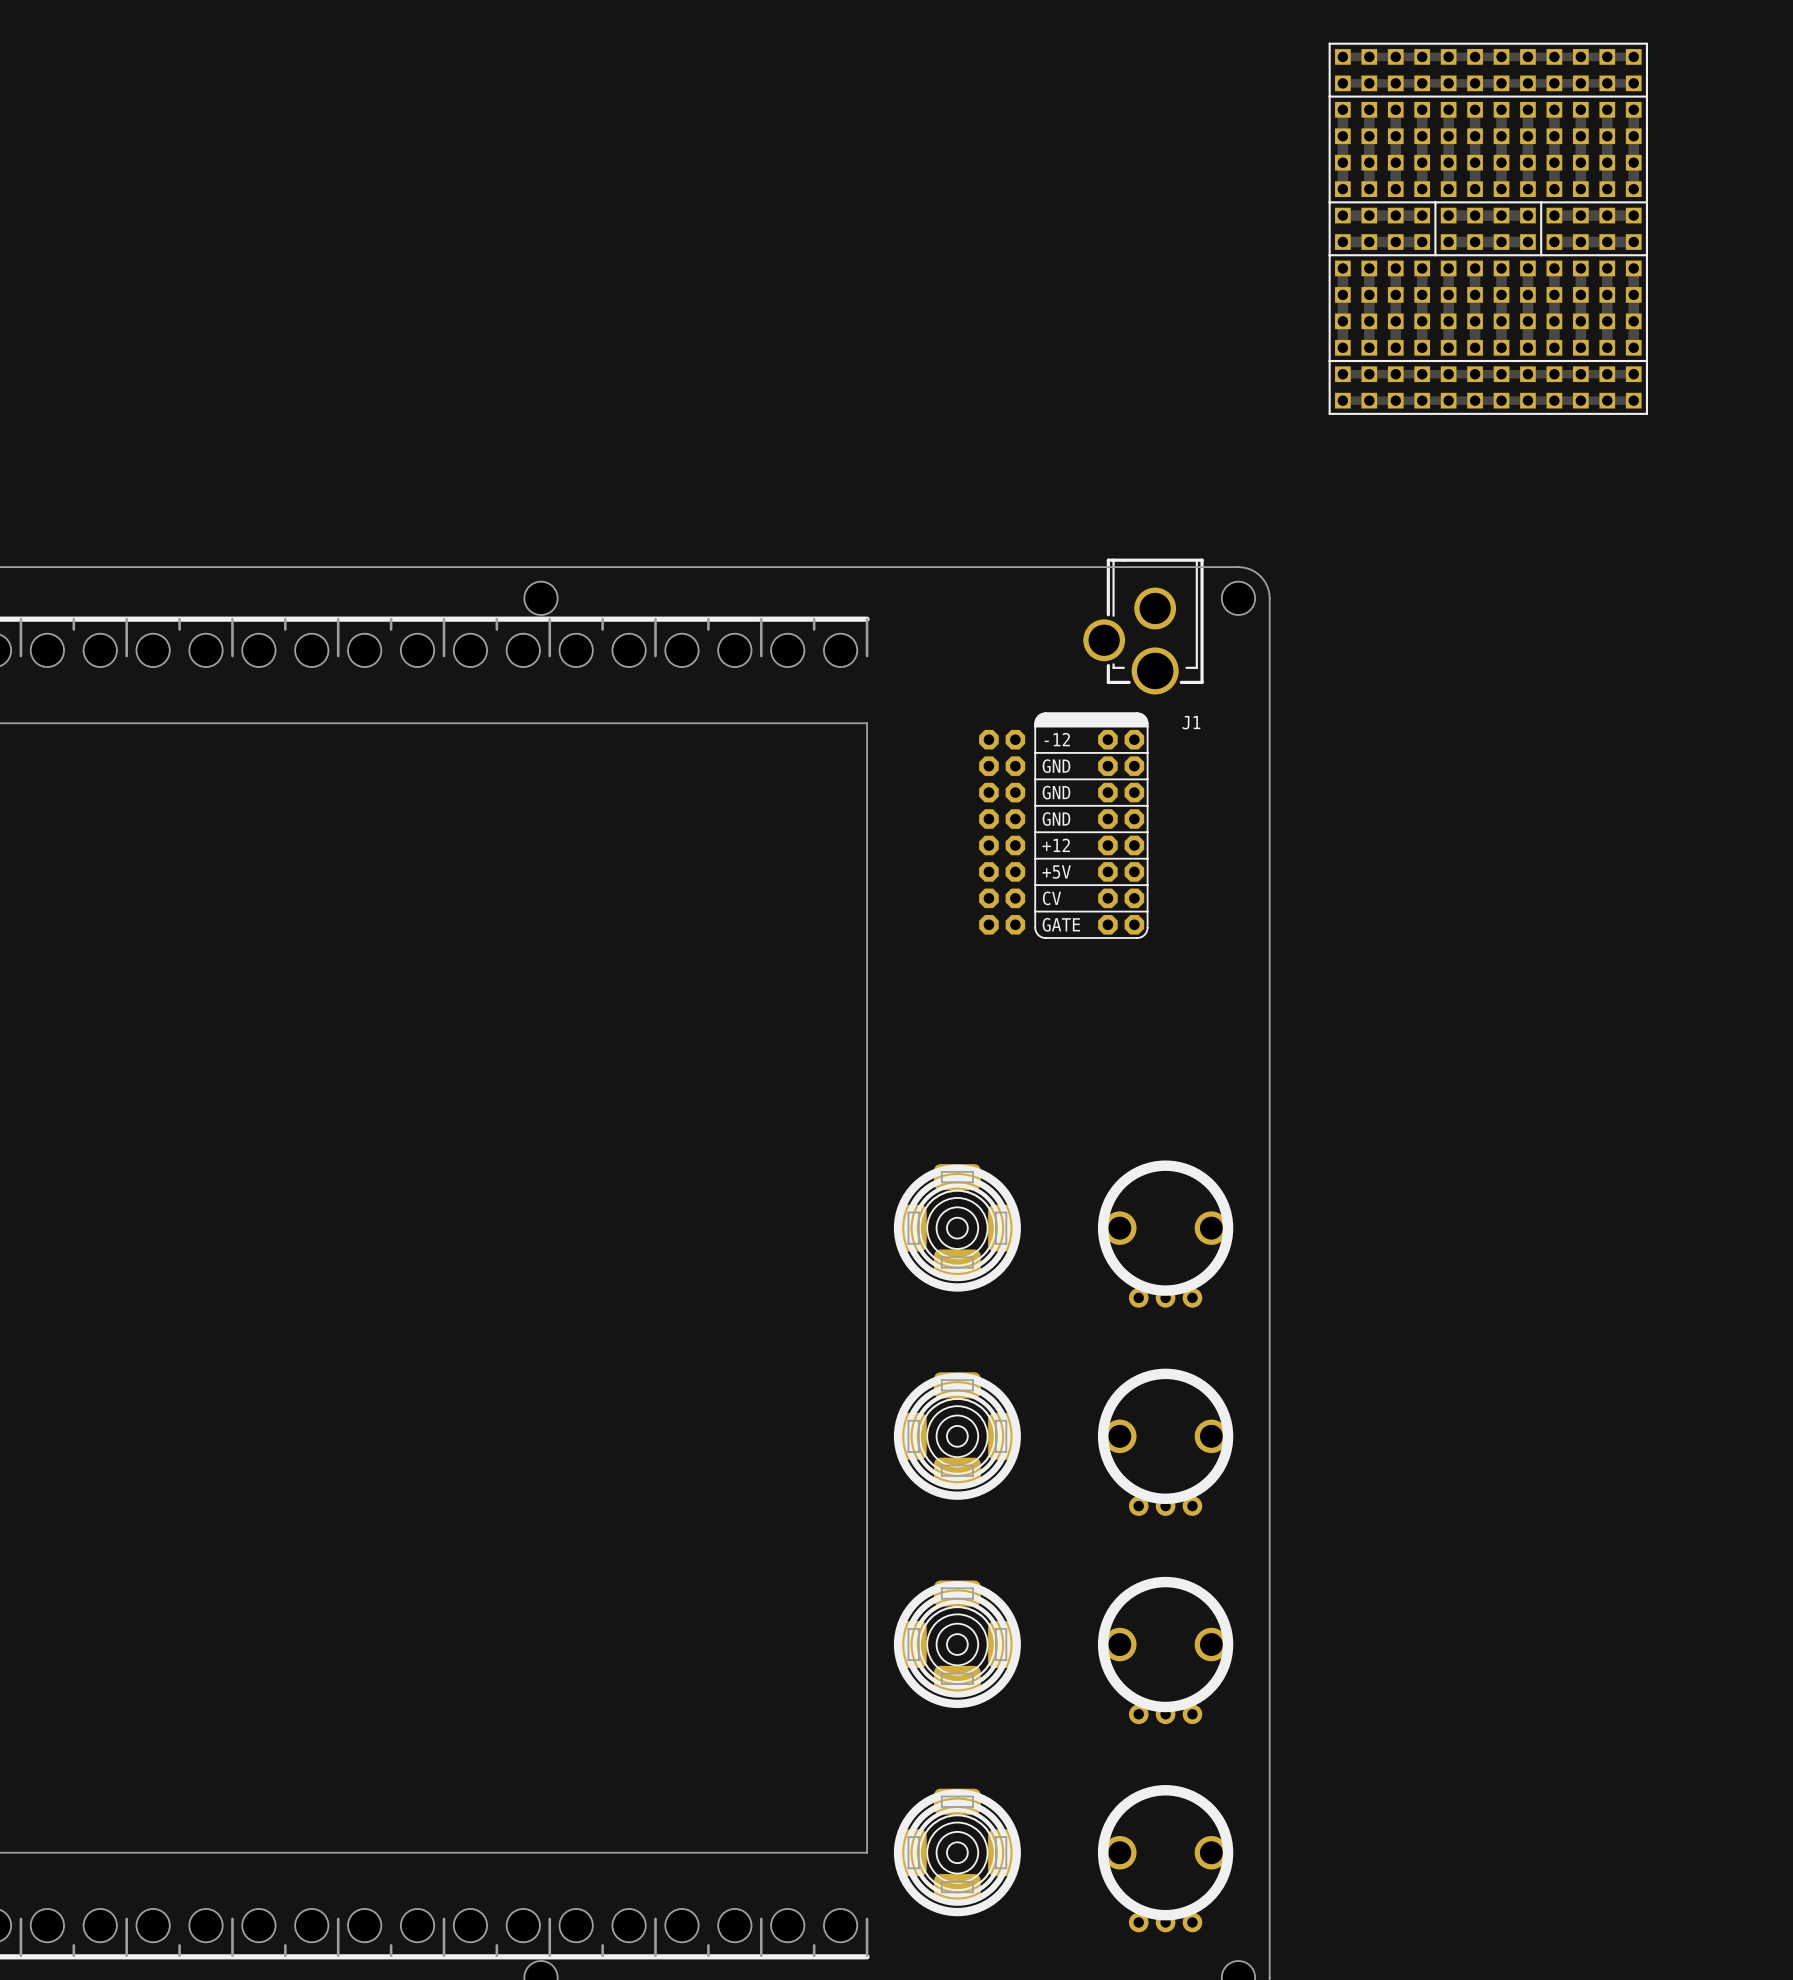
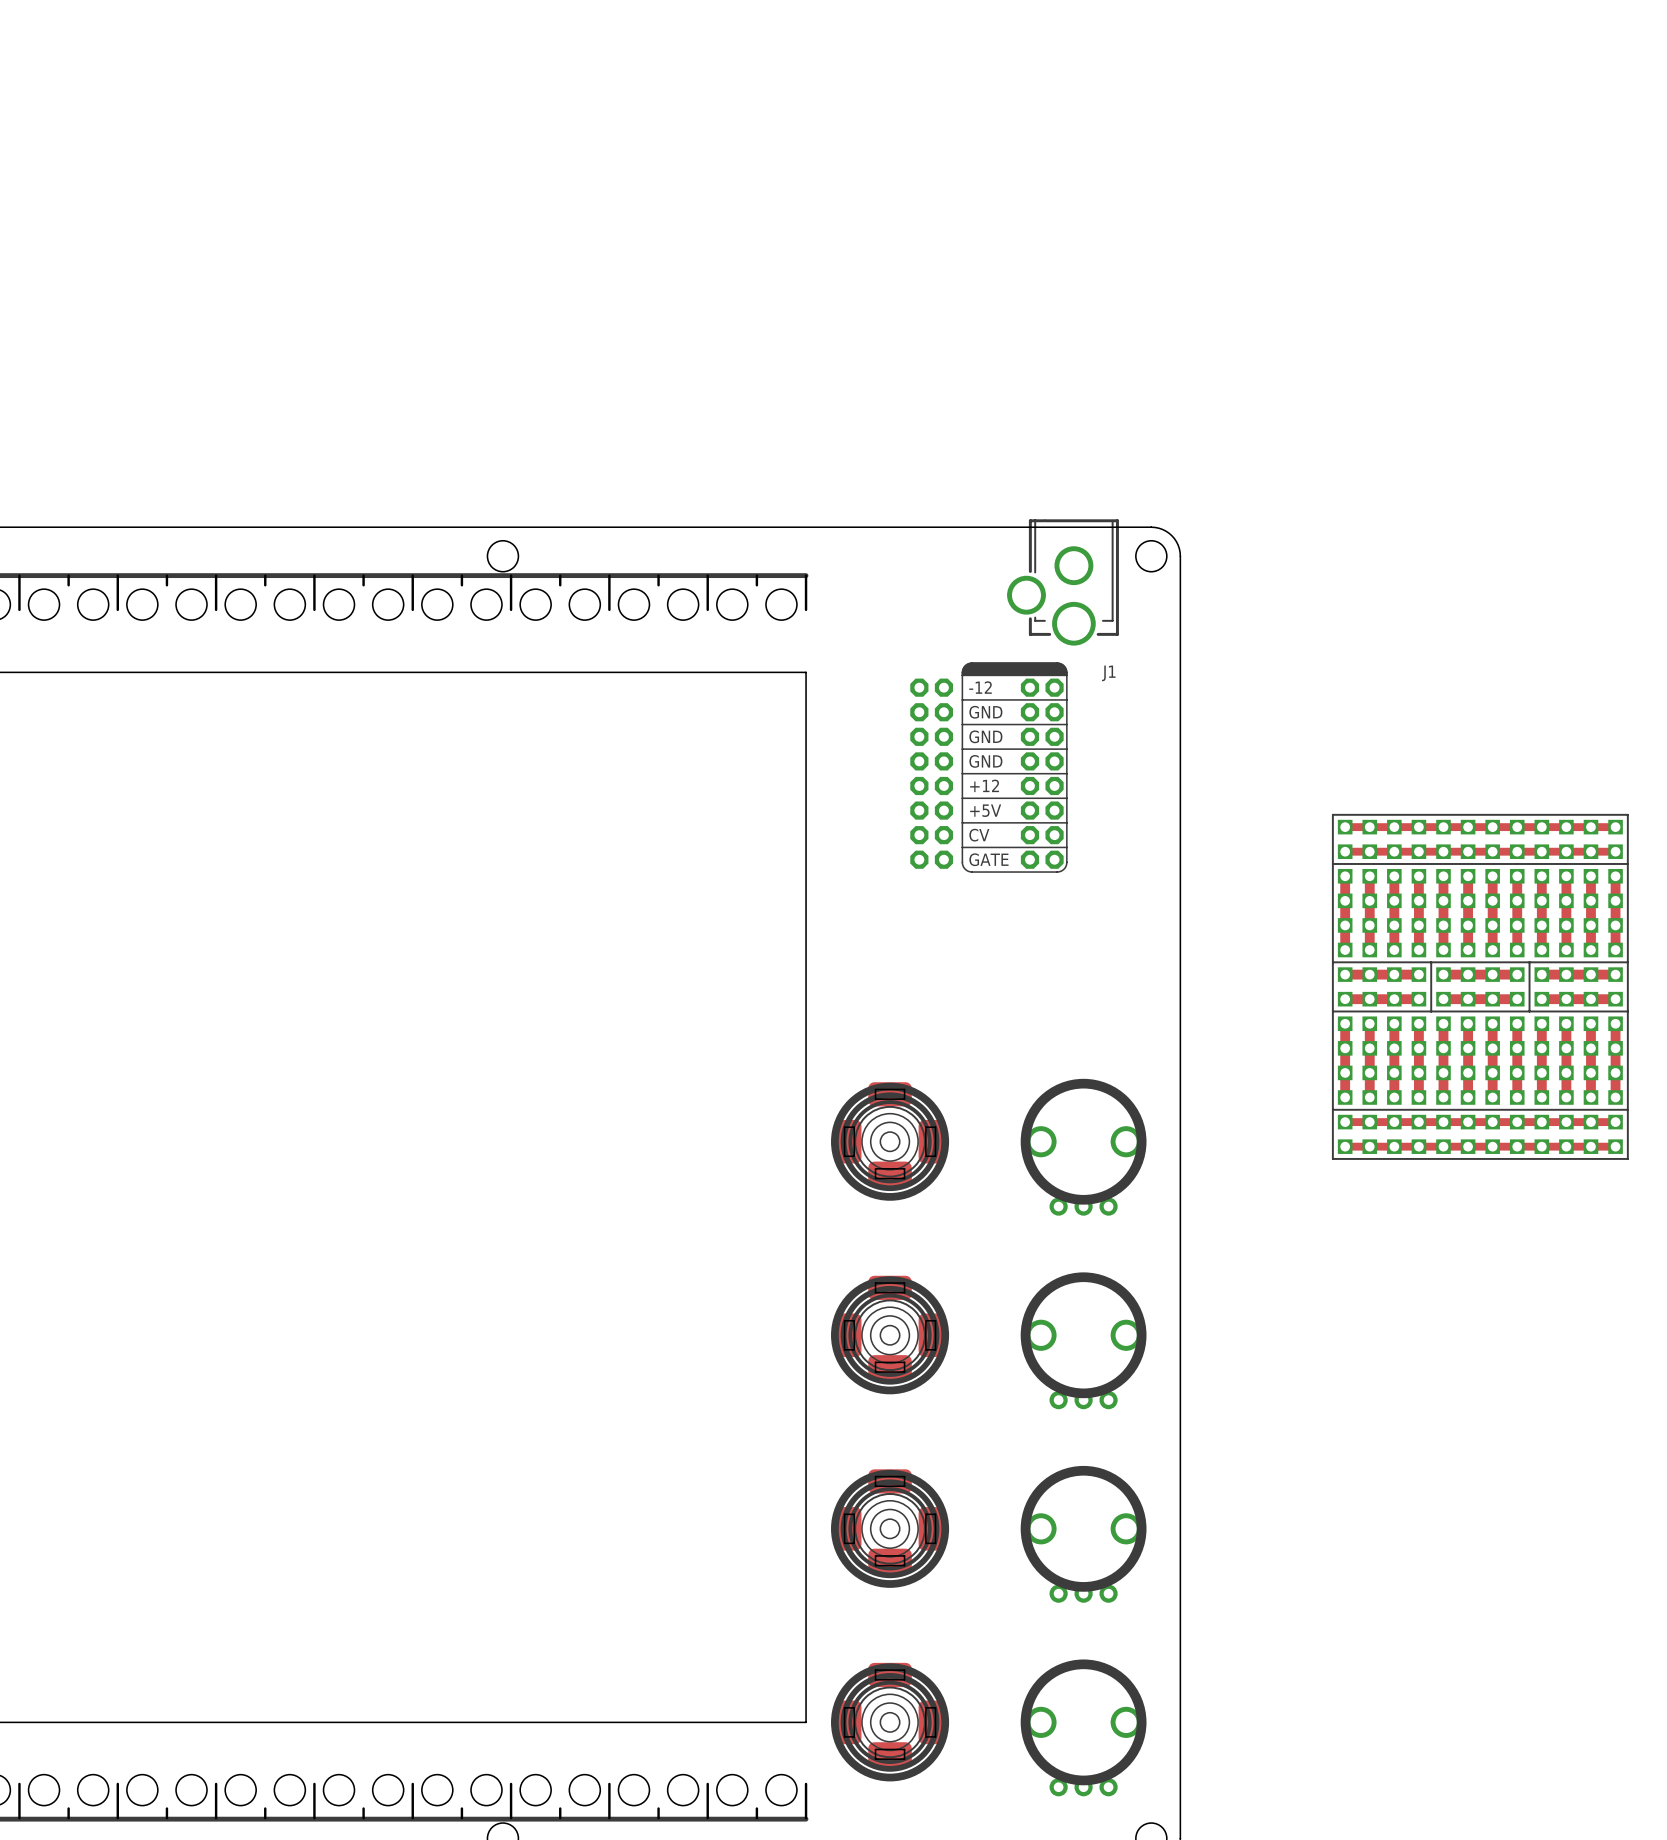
part: (1488, 228) -> none
part: none -> (1480, 986)

